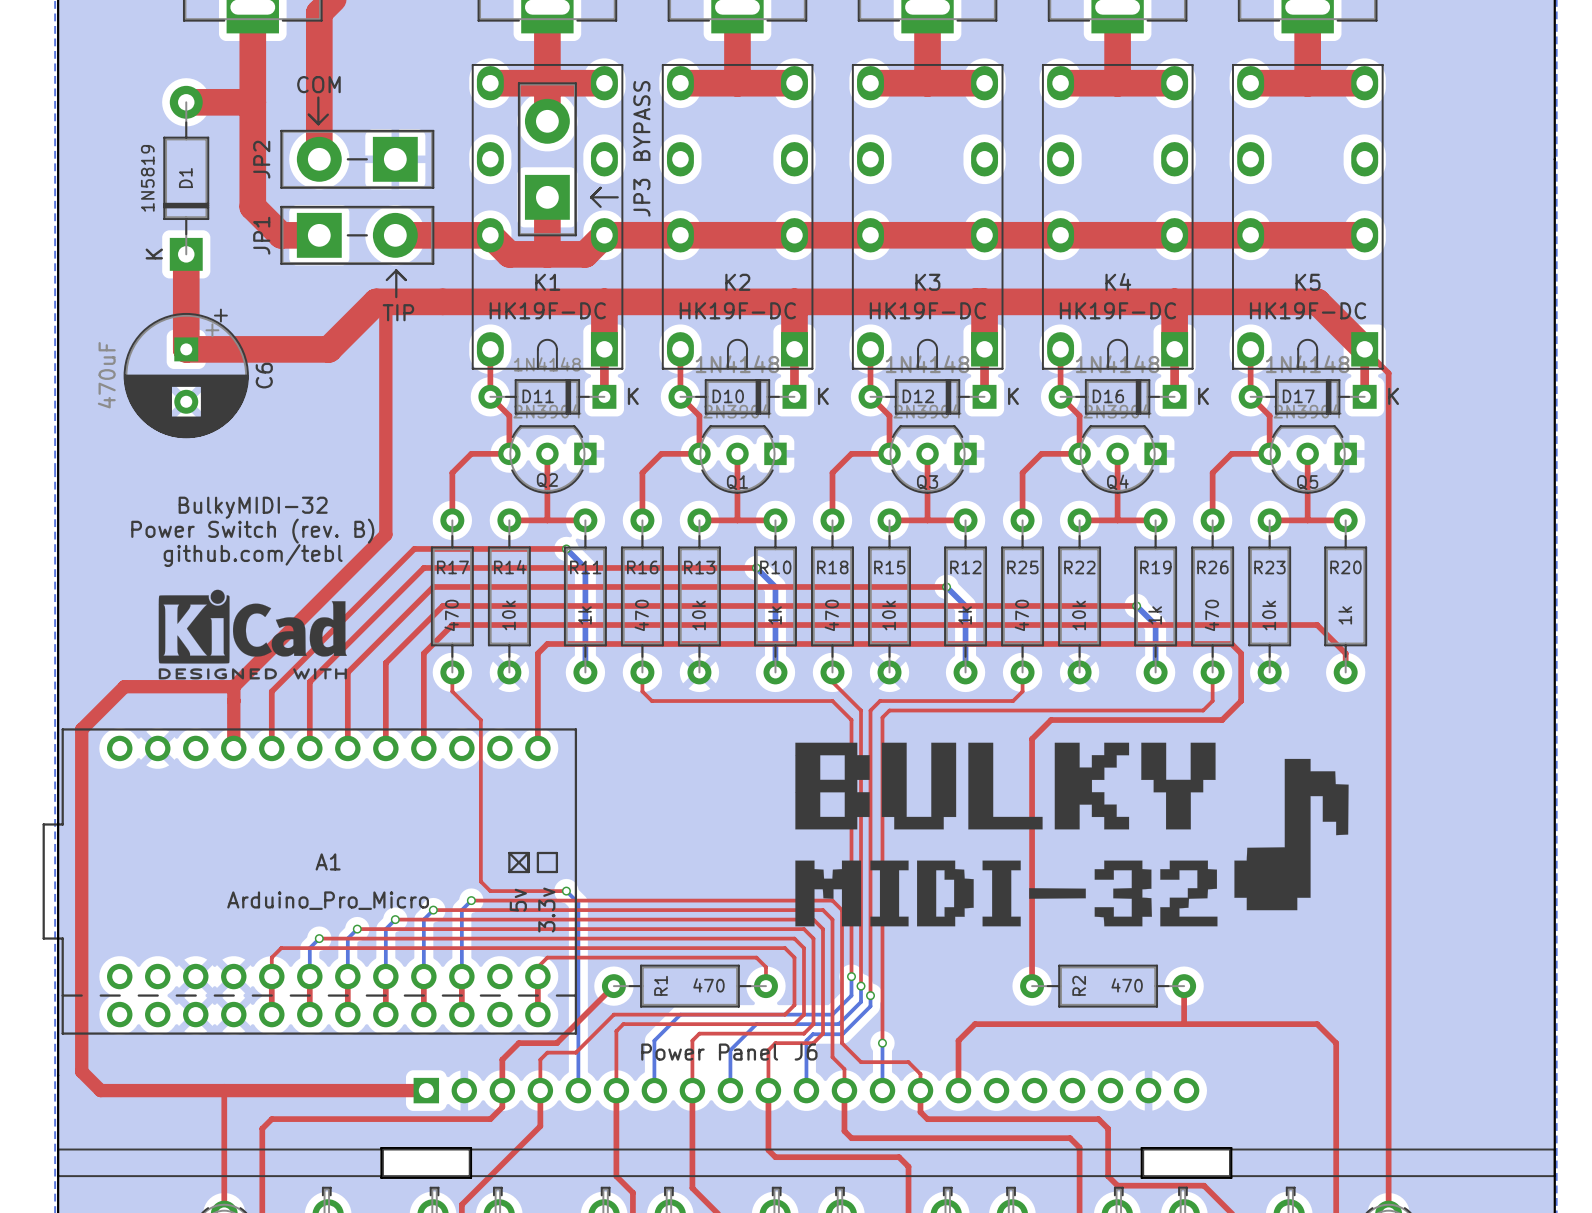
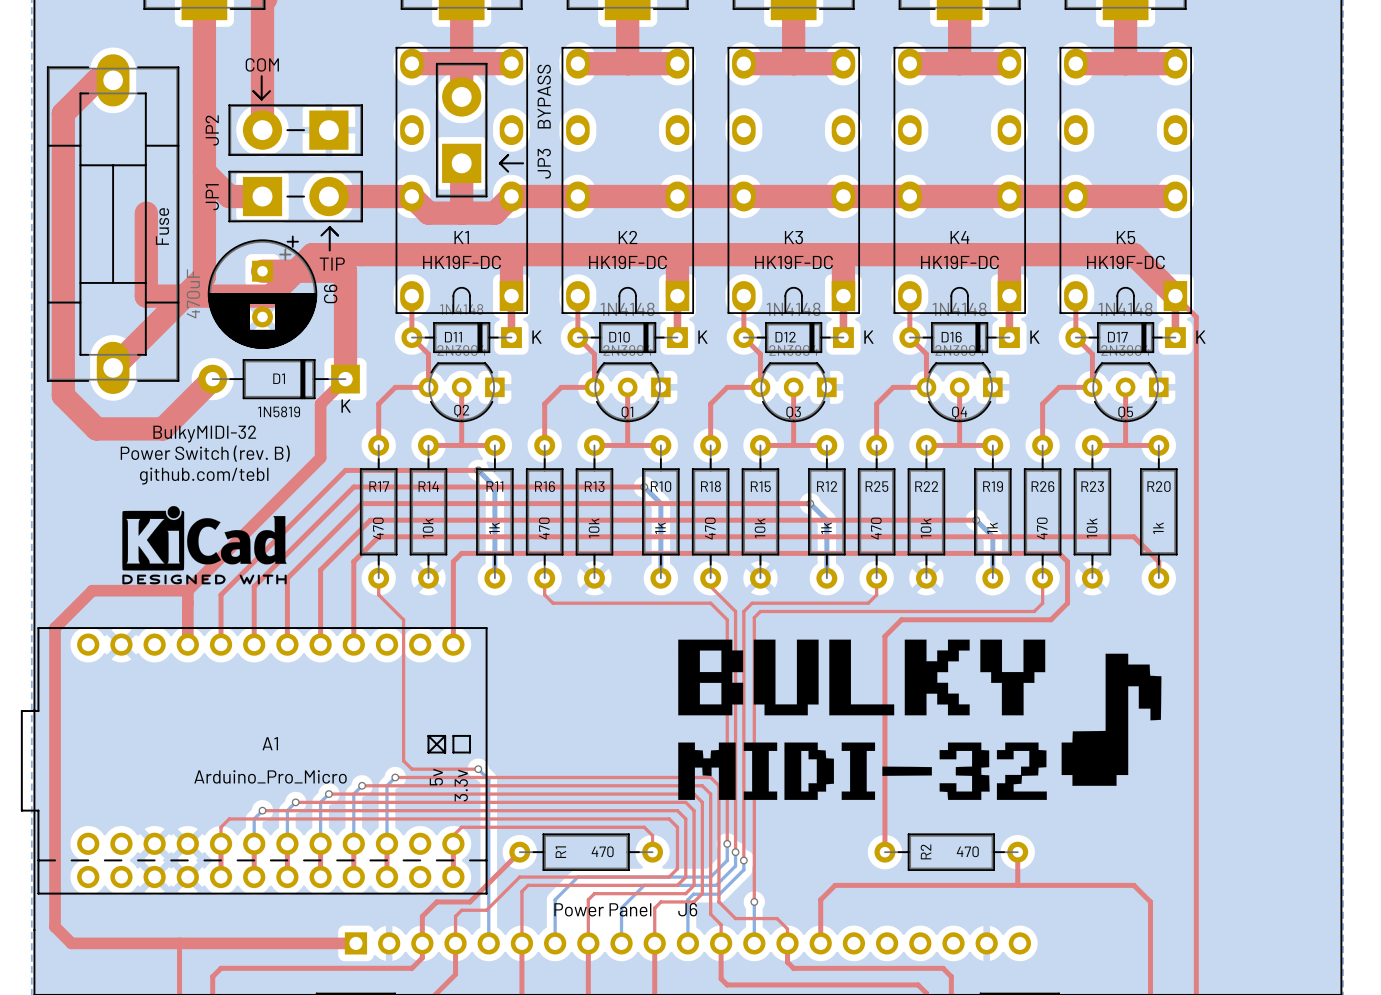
top track: none -> (113, 80) (96, 80) (63, 113) (63, 395) (96, 428) (162, 428) (212, 379)
top track: (186, 102) (252, 102) -> none
D1 rotation: 0° (186, 178) -> 90° counterclockwise (279, 379)
D1 position: (186, 178) -> (279, 379)
top track: none -> (204, 171) (204, 276) (113, 367)
part: none -> Fuse (113, 224)
top track: (442, 301) (385, 301) (385, 472) -> (262, 271) (345, 271) (345, 379) (320, 404)
C6 position: (186, 373) -> (262, 292)

